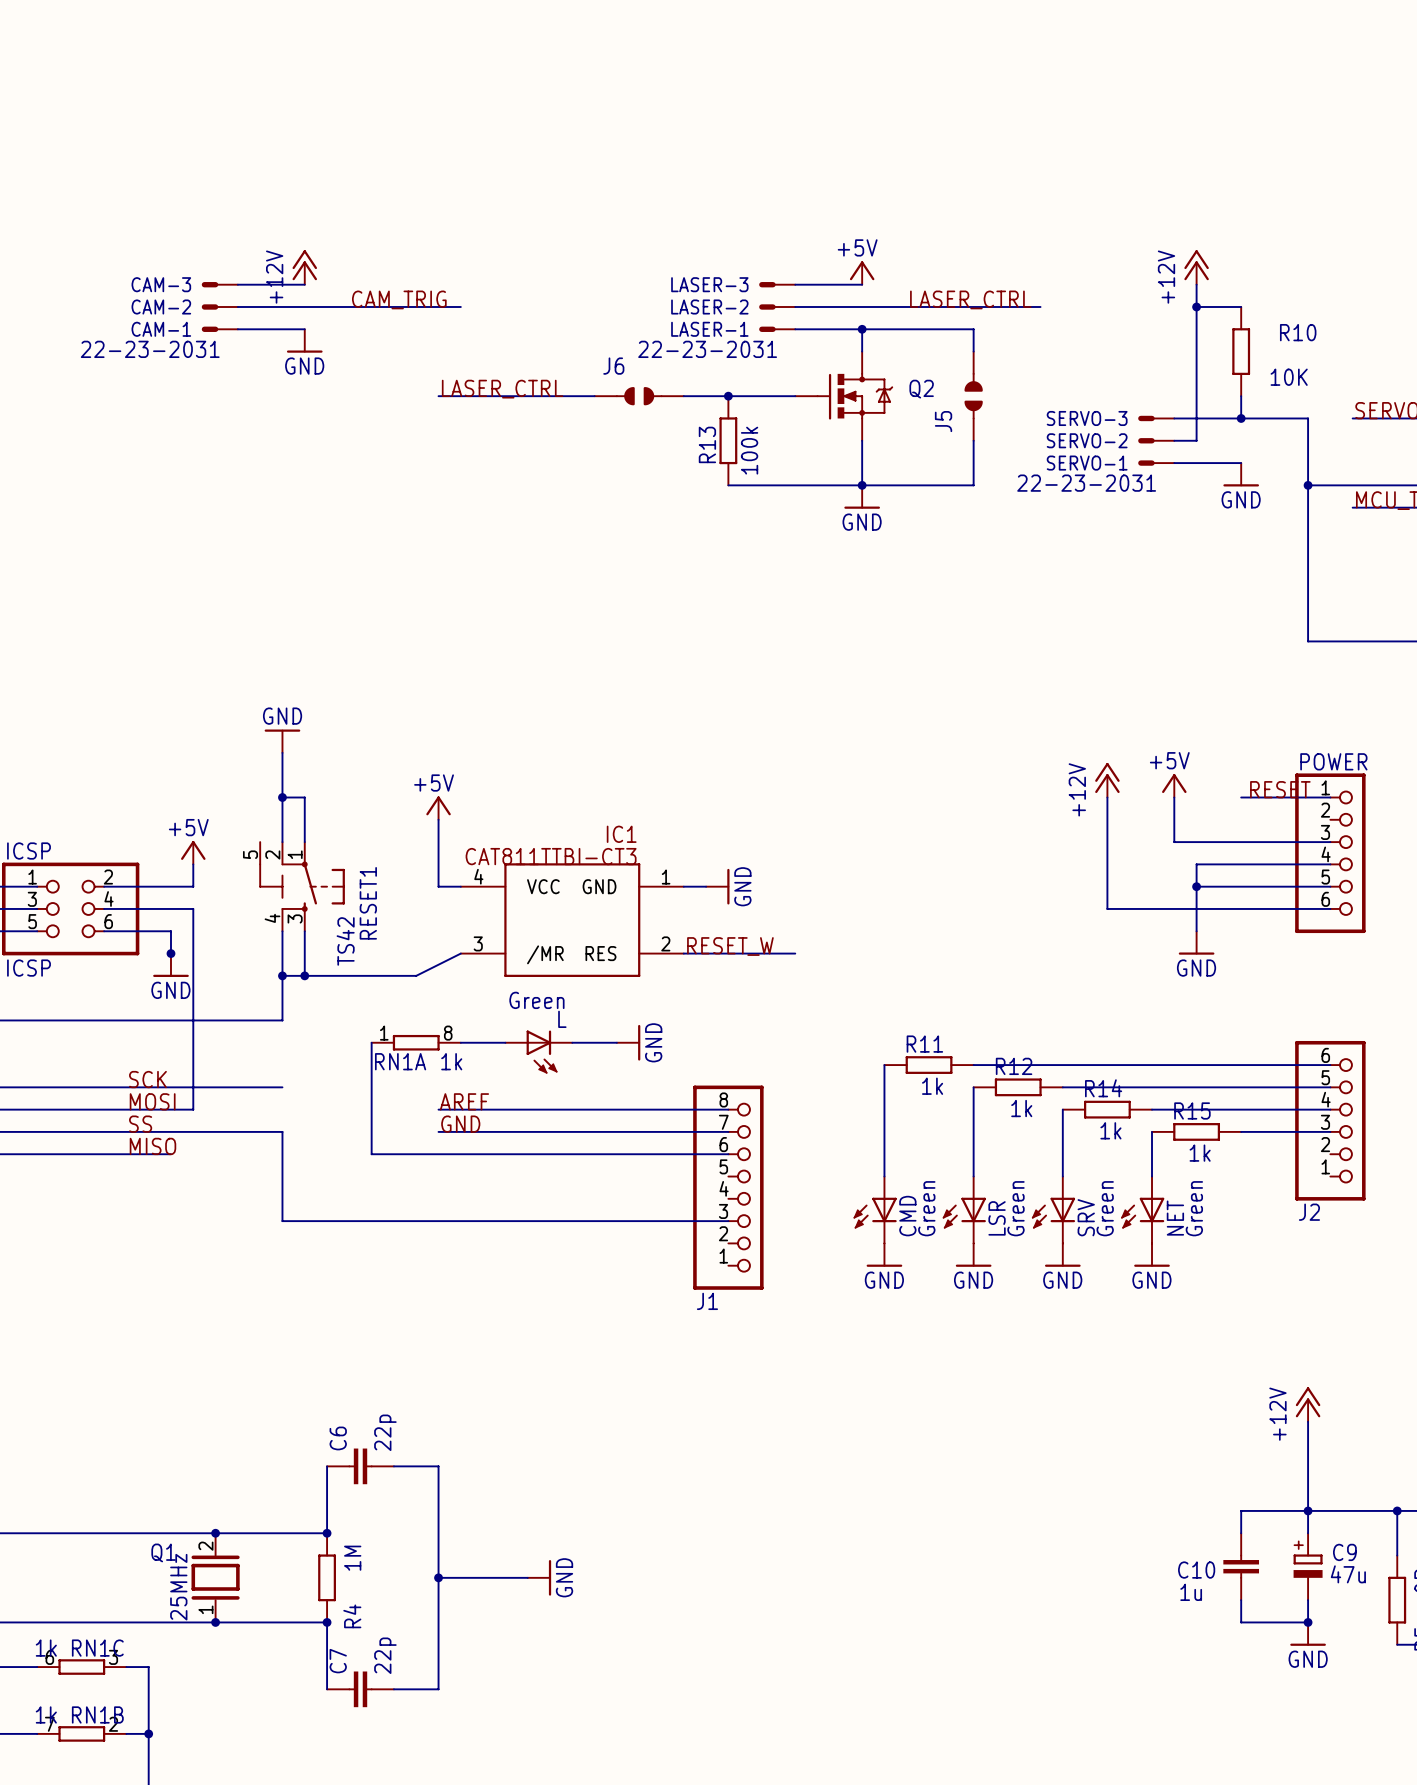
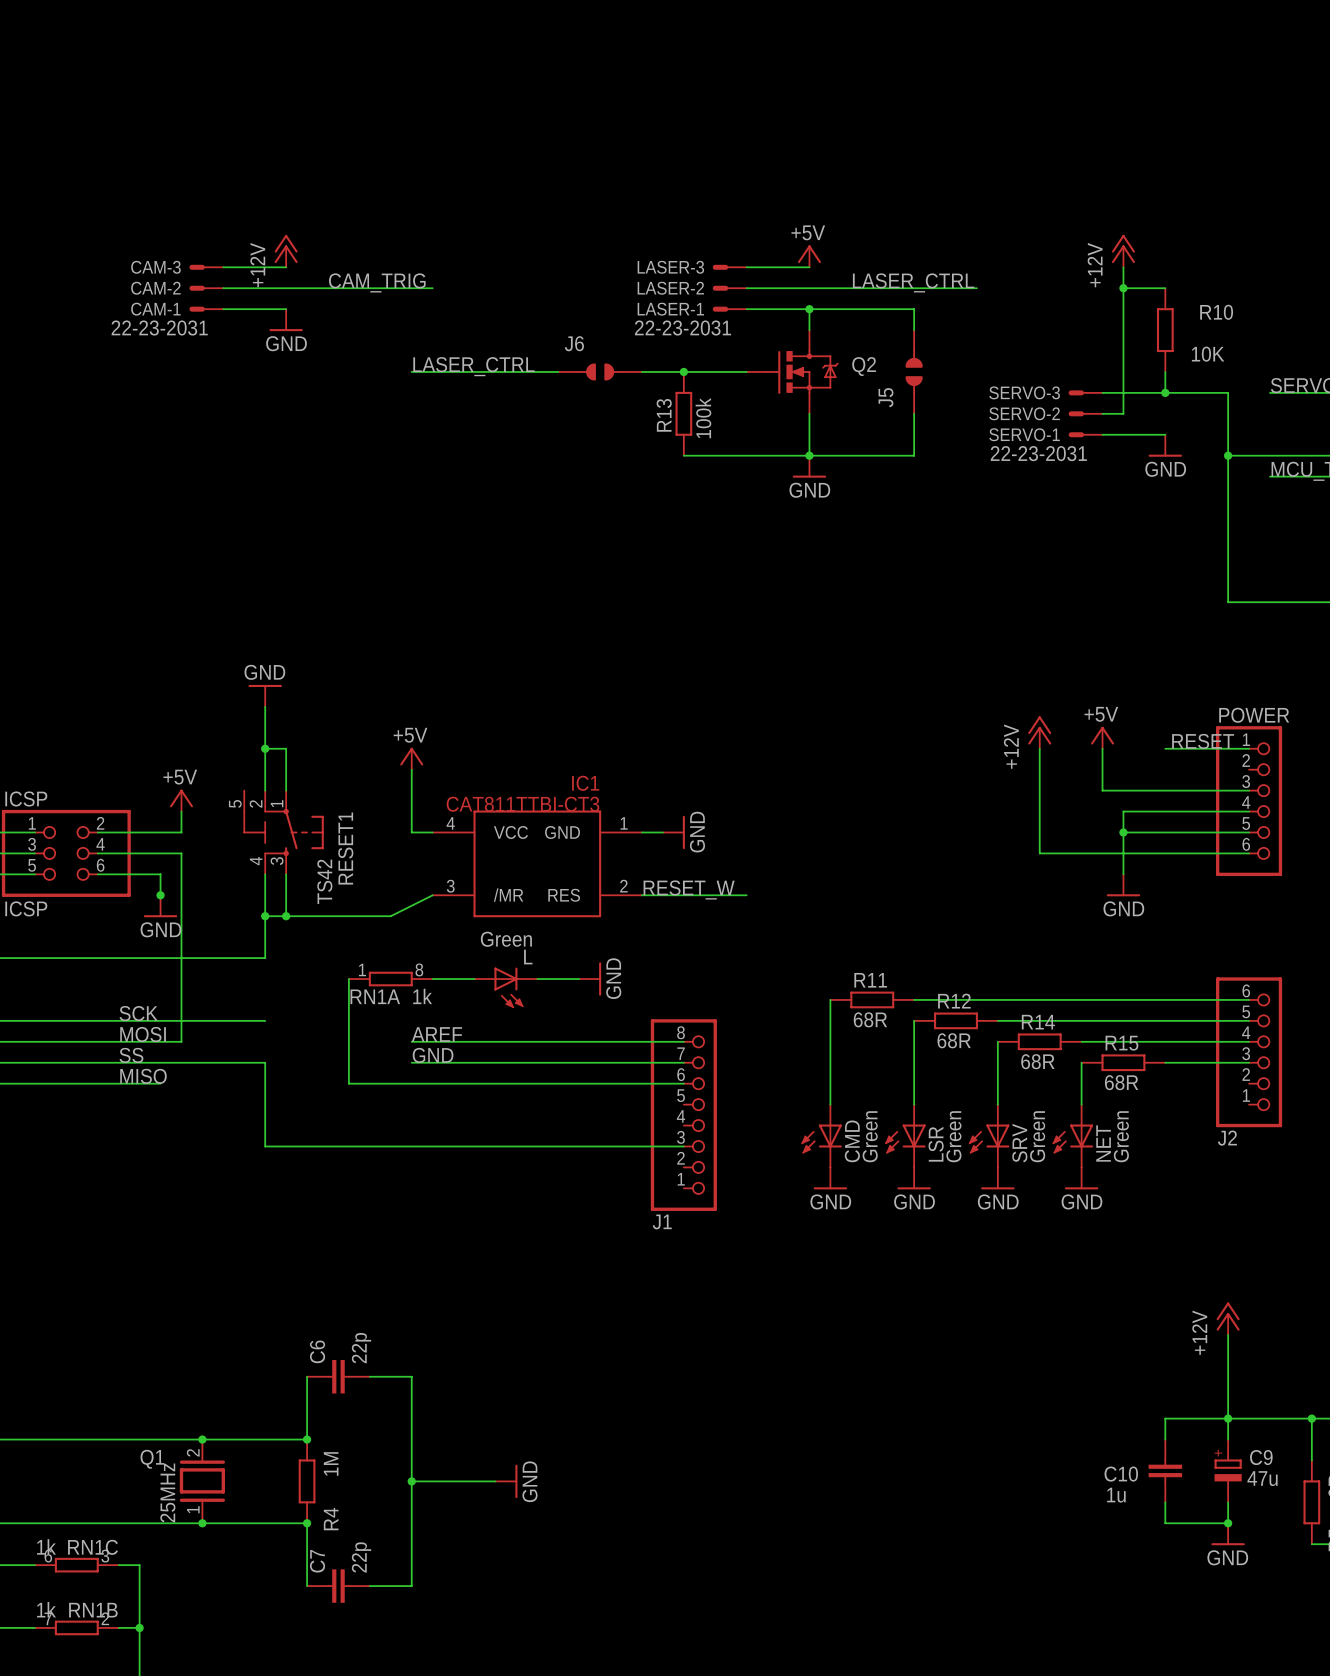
R11 value: 1k (932, 1086) -> 68R (870, 1019)
R12 value: 1k (1021, 1108) -> 68R (954, 1040)
R14 value: 1k (1110, 1130) -> 68R (1037, 1061)
R15 value: 1k (1200, 1153) -> 68R (1121, 1082)

